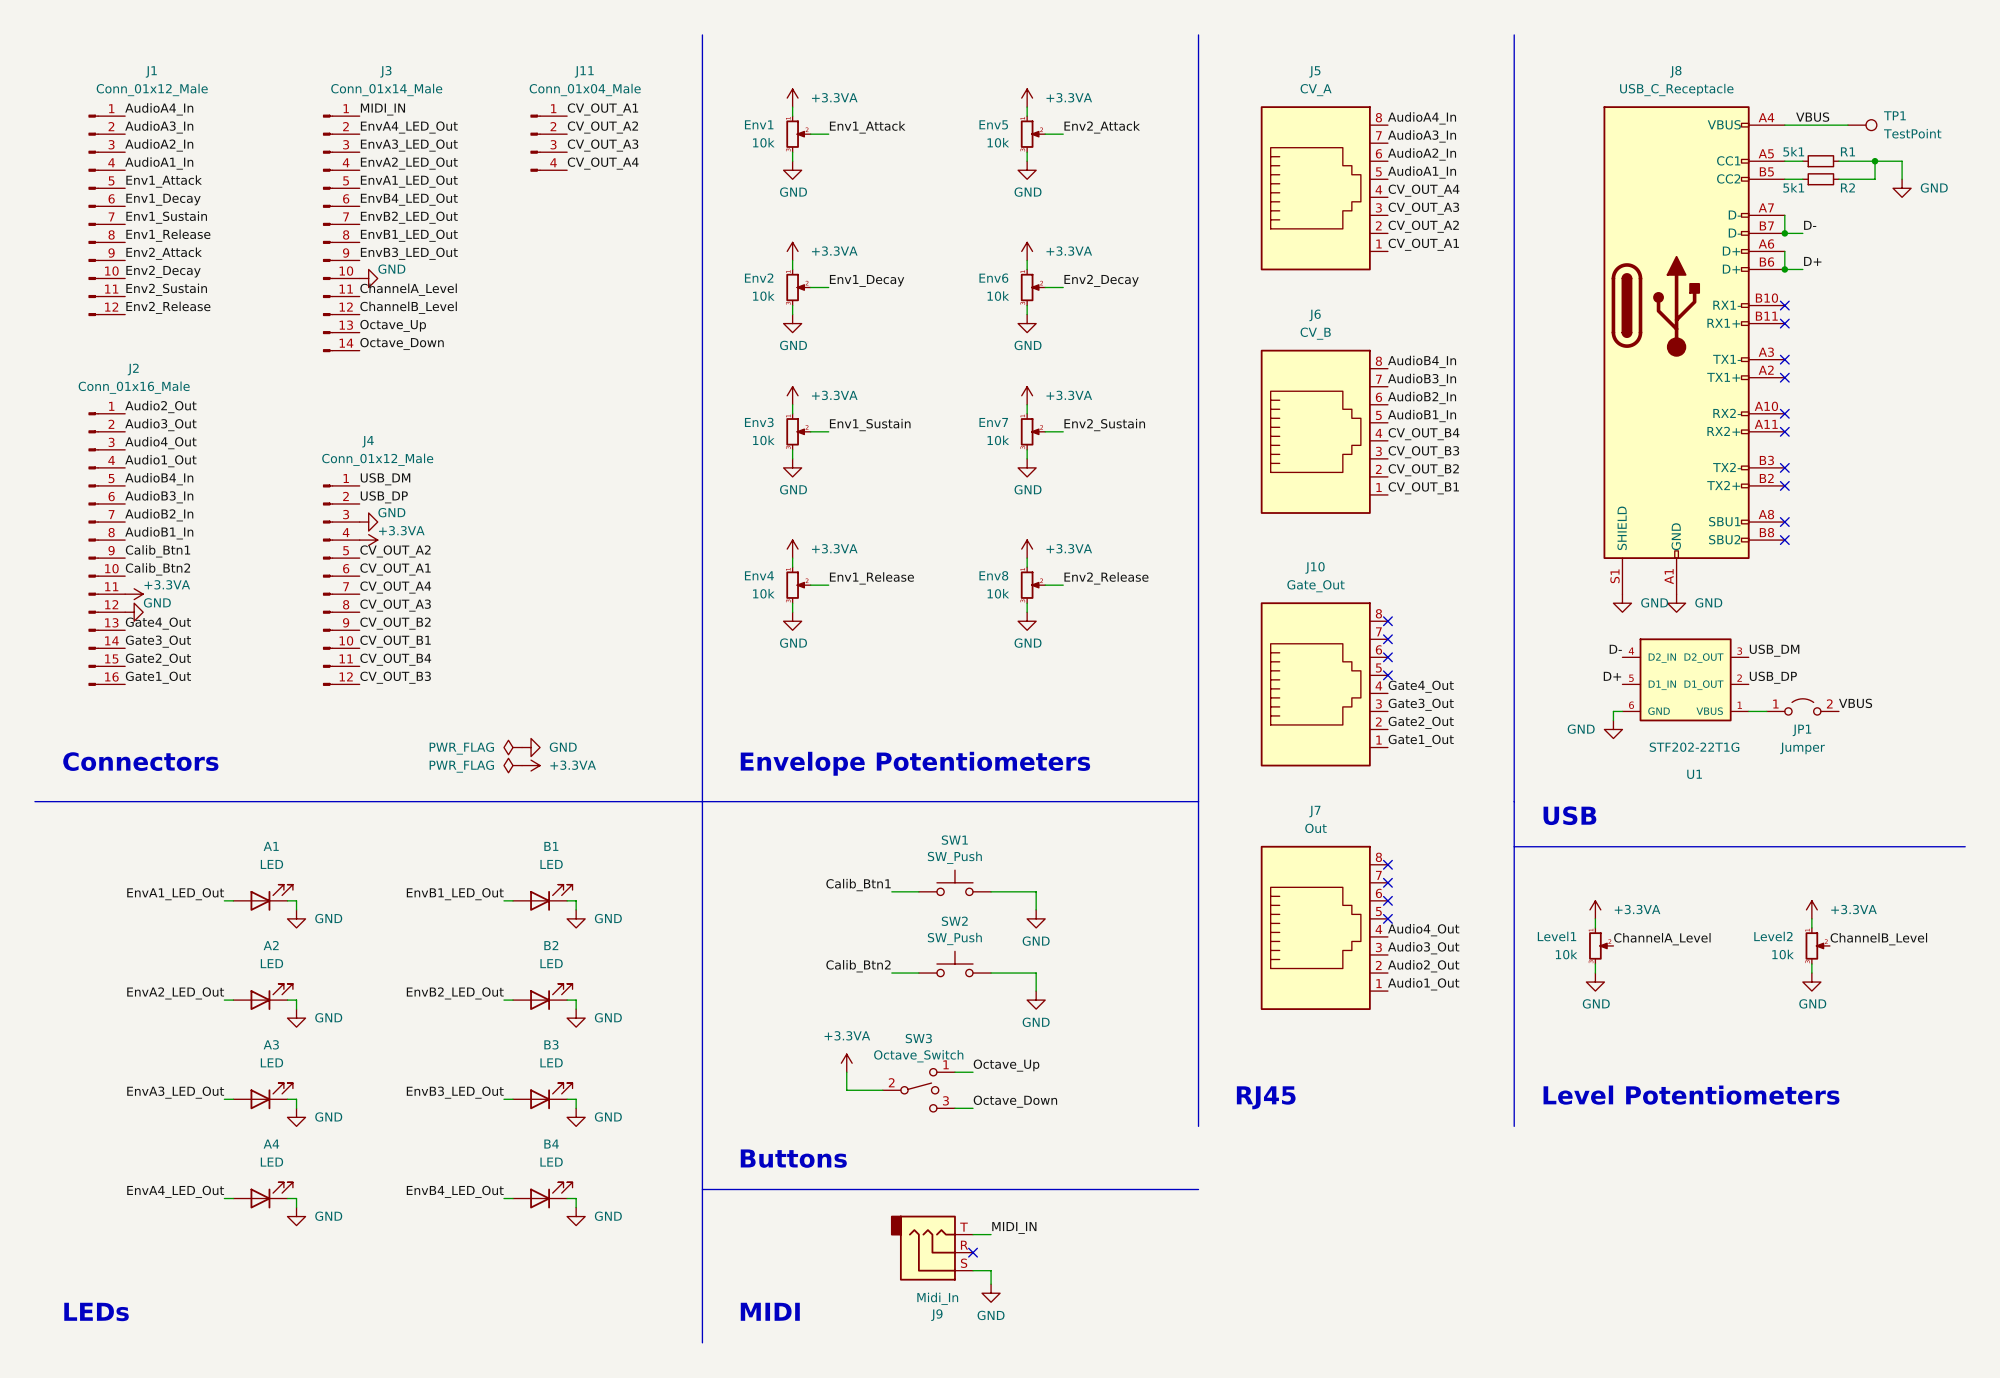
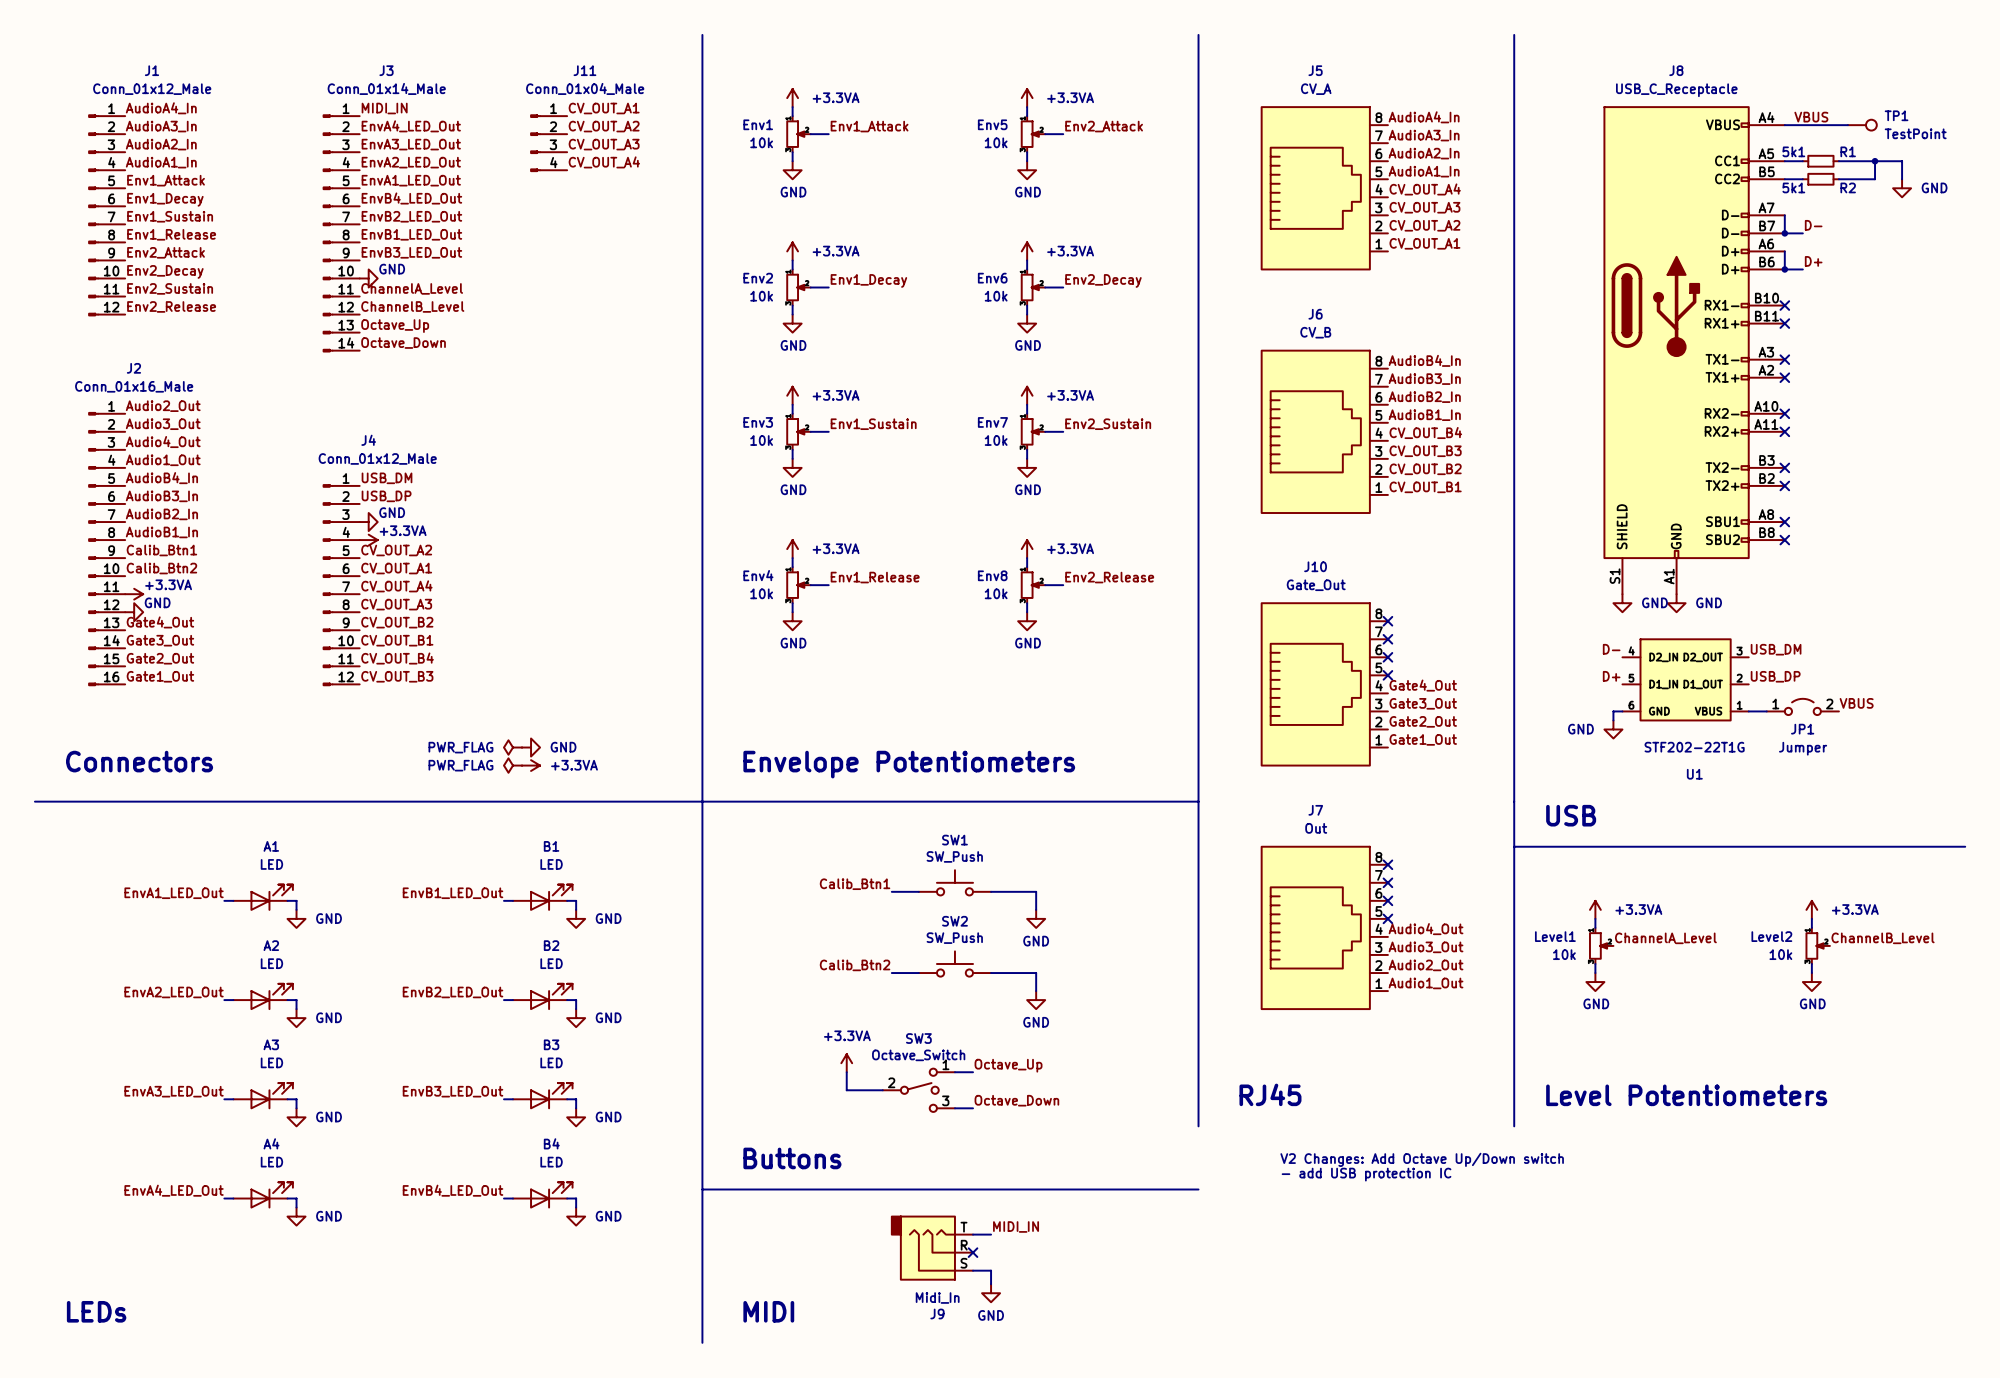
text: none -> V2 Changes: Add Octave Up/Down switch (1422, 1159)
text: none -> - add USB protection IC (1366, 1174)

